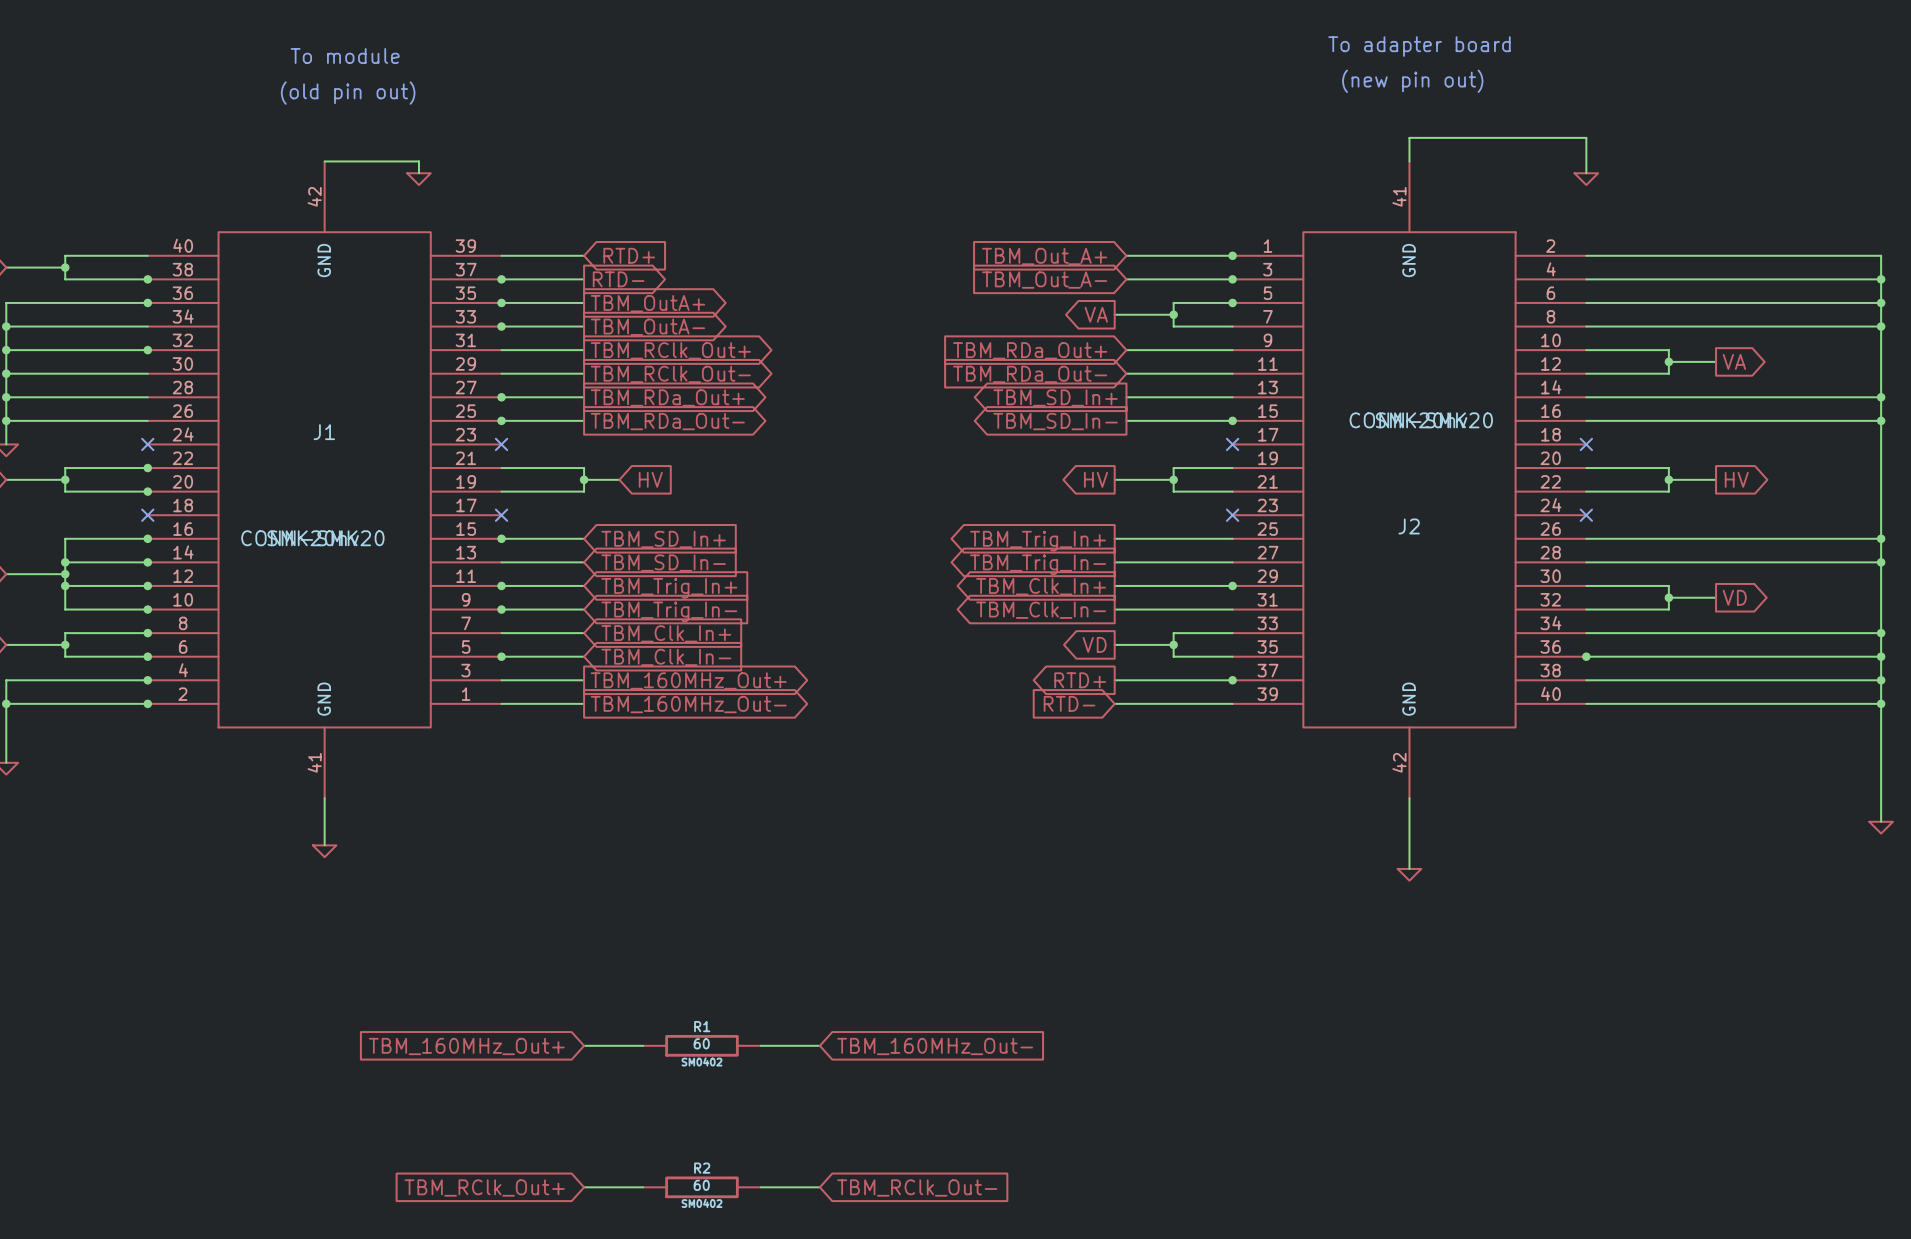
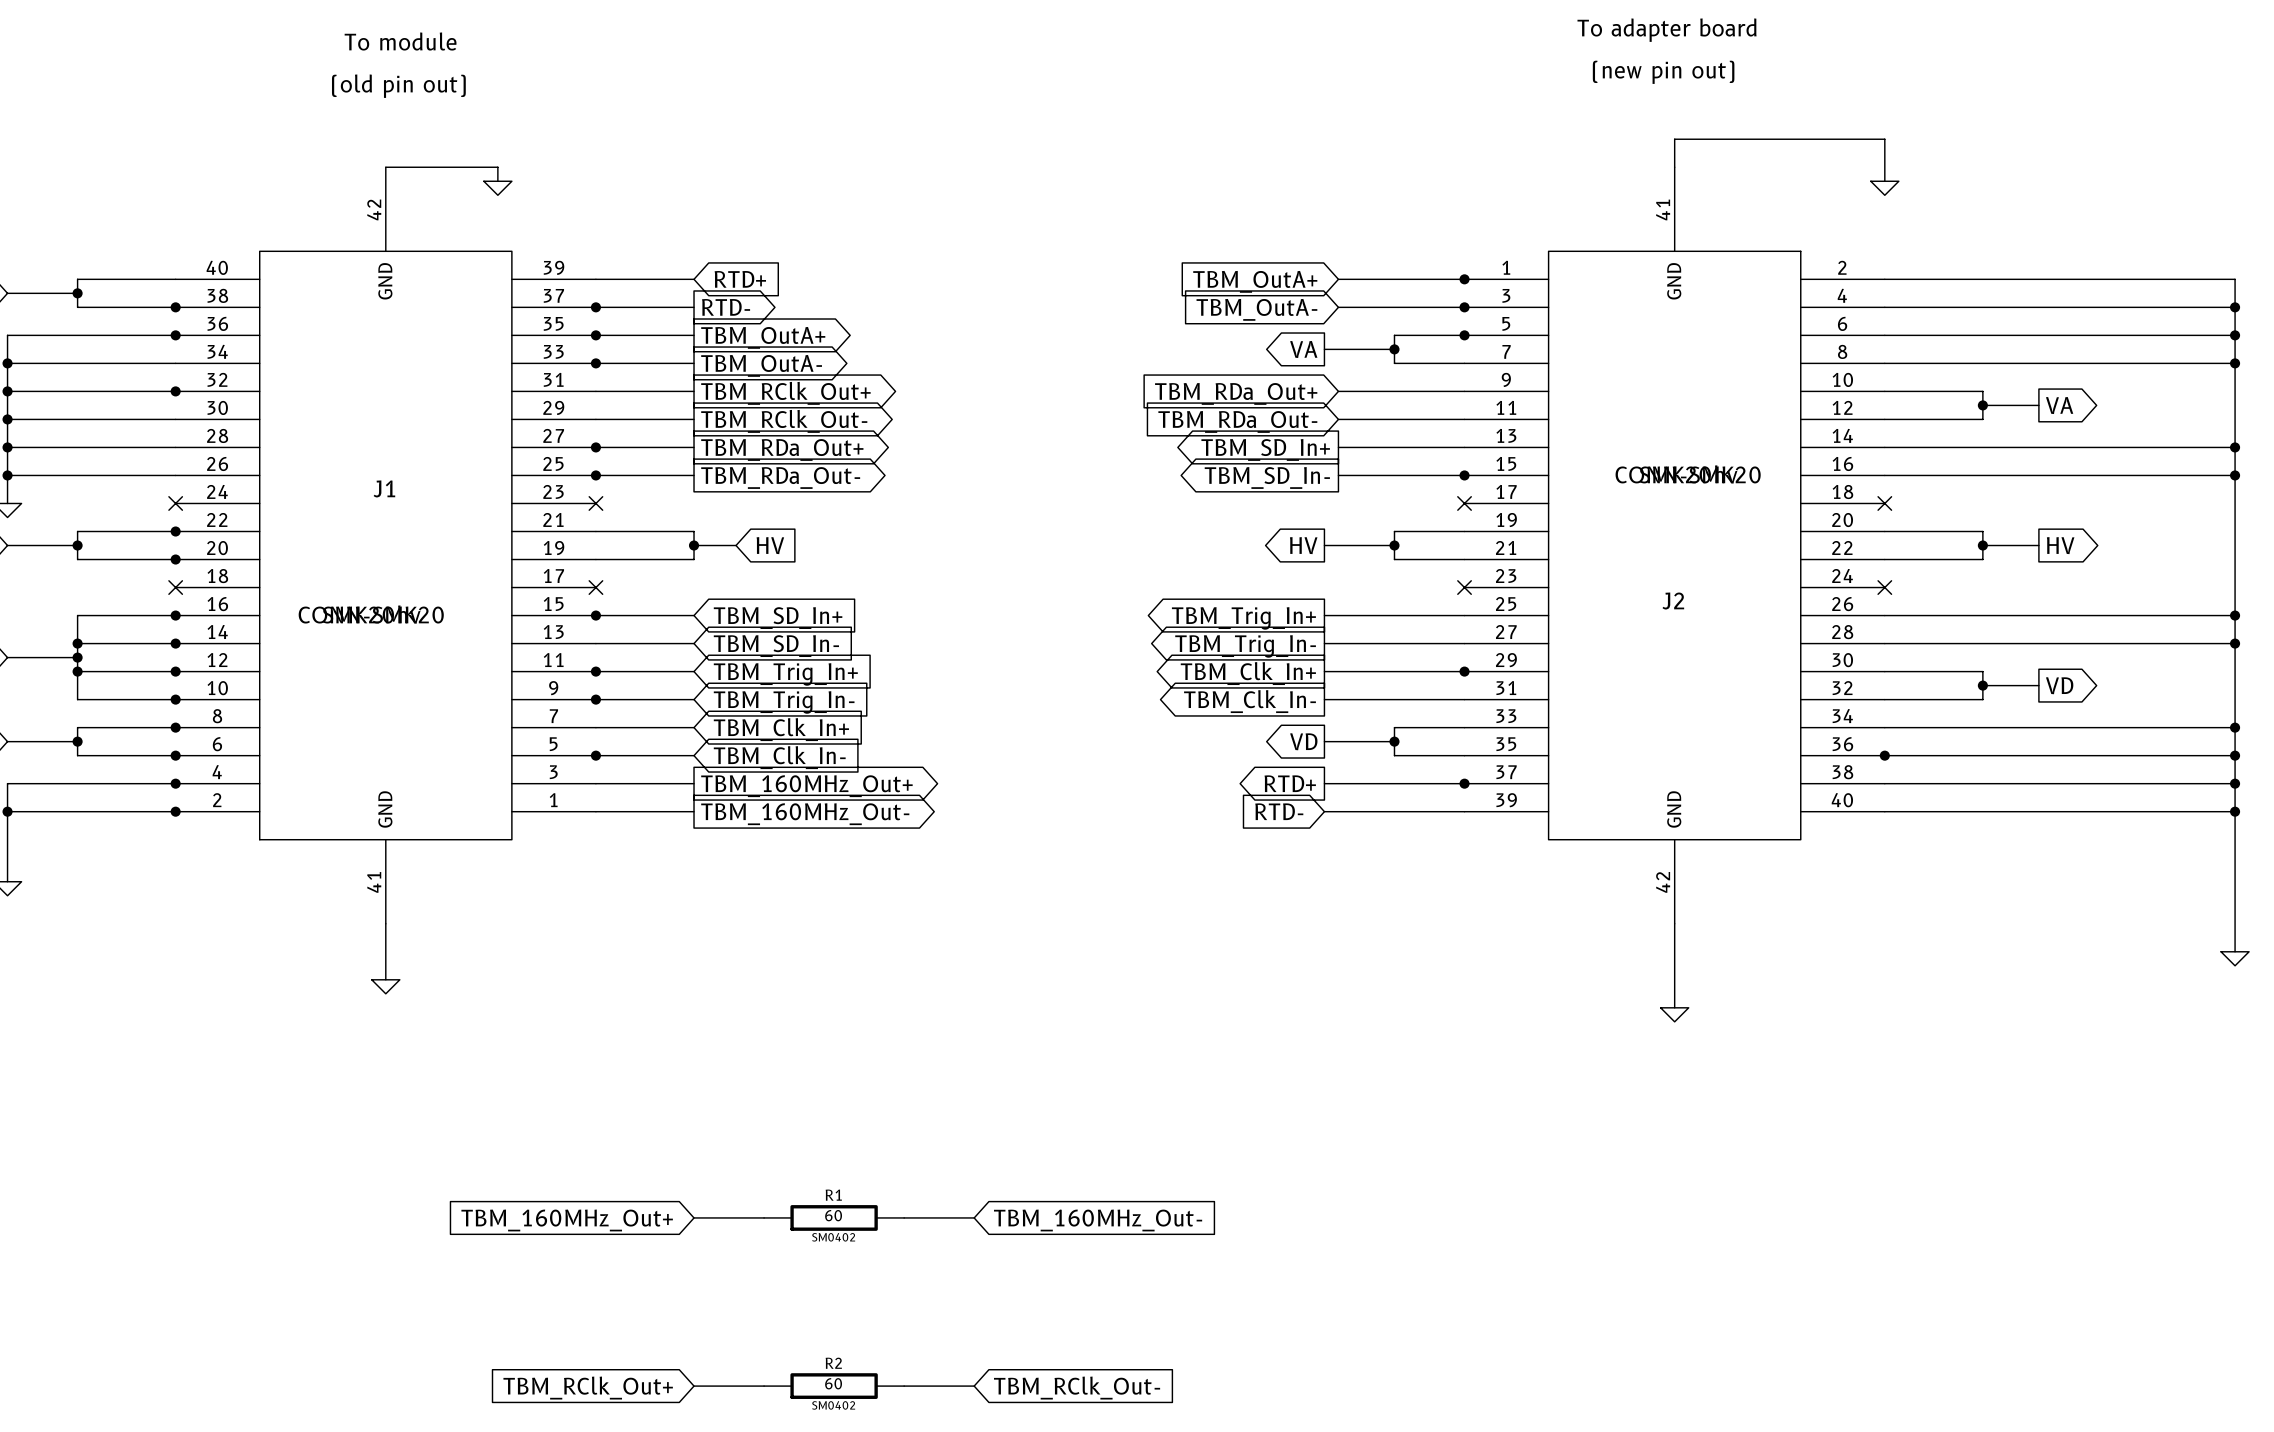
global label: TBM_Out_A+ (1044, 256) -> TBM_OutA+ (1255, 281)
global label: TBM_Out_A- (1044, 280) -> TBM_OutA- (1256, 309)

